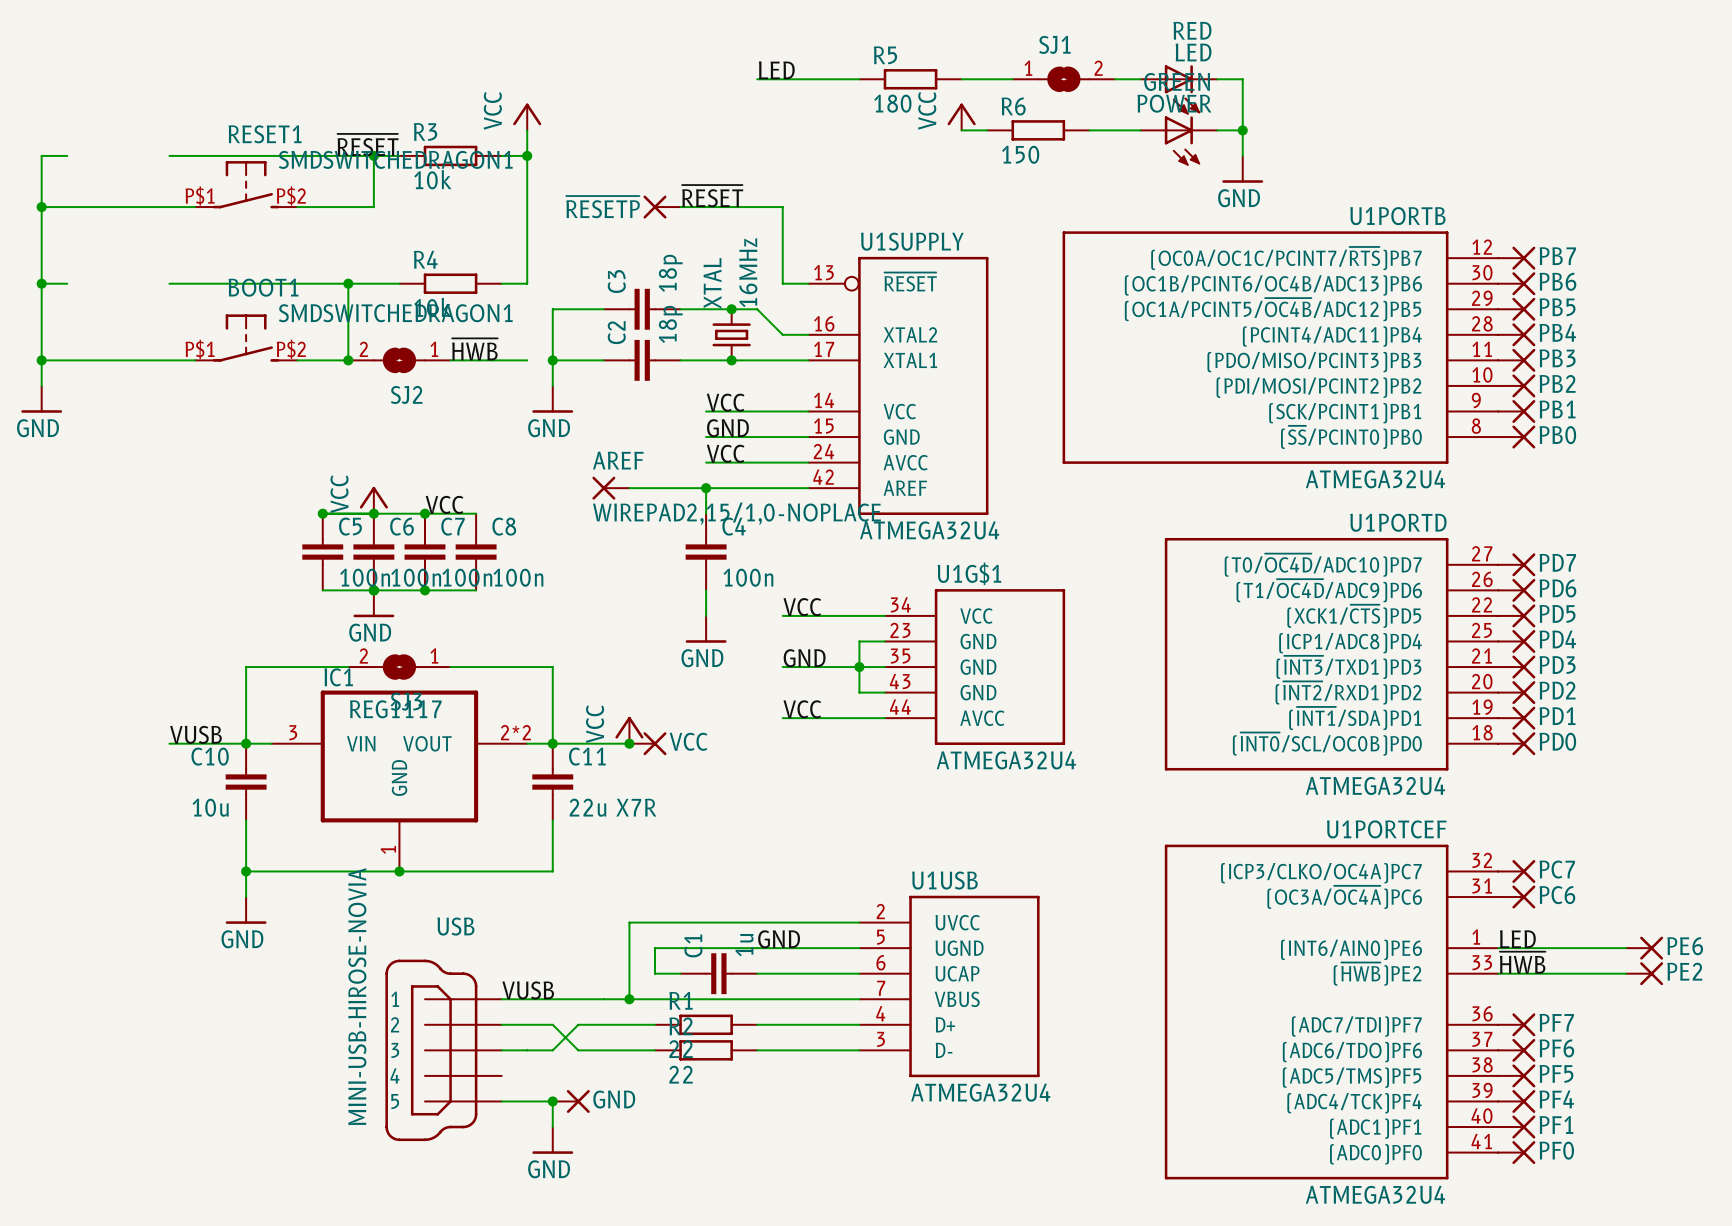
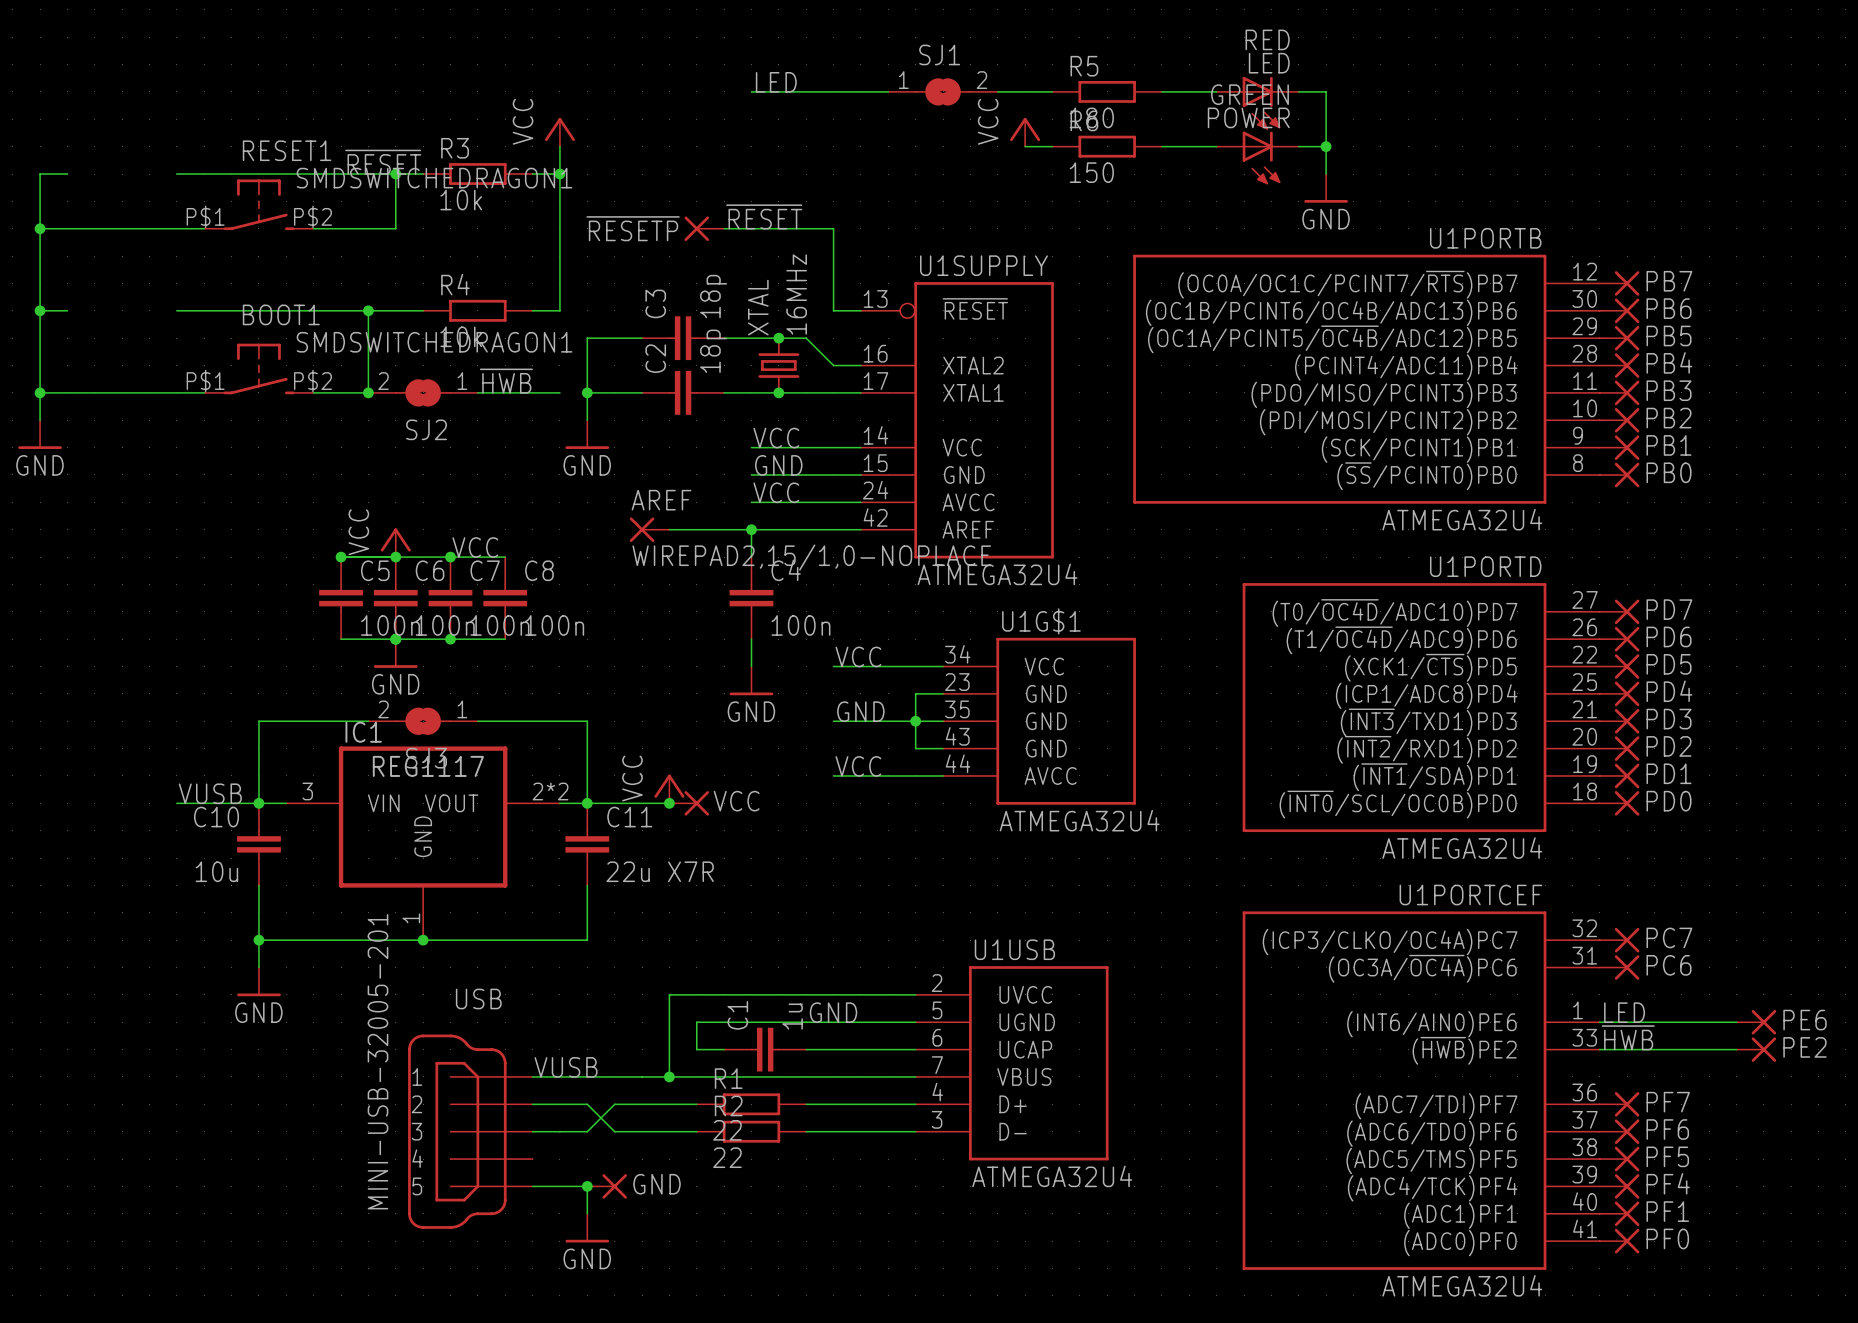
label position: LED (776, 70) -> LED (776, 82)
wire: none -> (751, 91) (806, 91)
R5 position: (910, 79) -> (1107, 91)
SJ1 position: (1063, 79) -> (943, 91)
USB value: MINI-USB-HIROSE-NOVIA (357, 996) -> MINI-USB-32005-201 (377, 1061)

